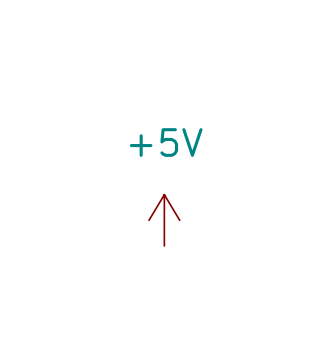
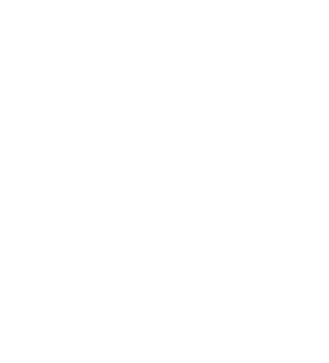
power symbol: +5V (164, 220) -> none

